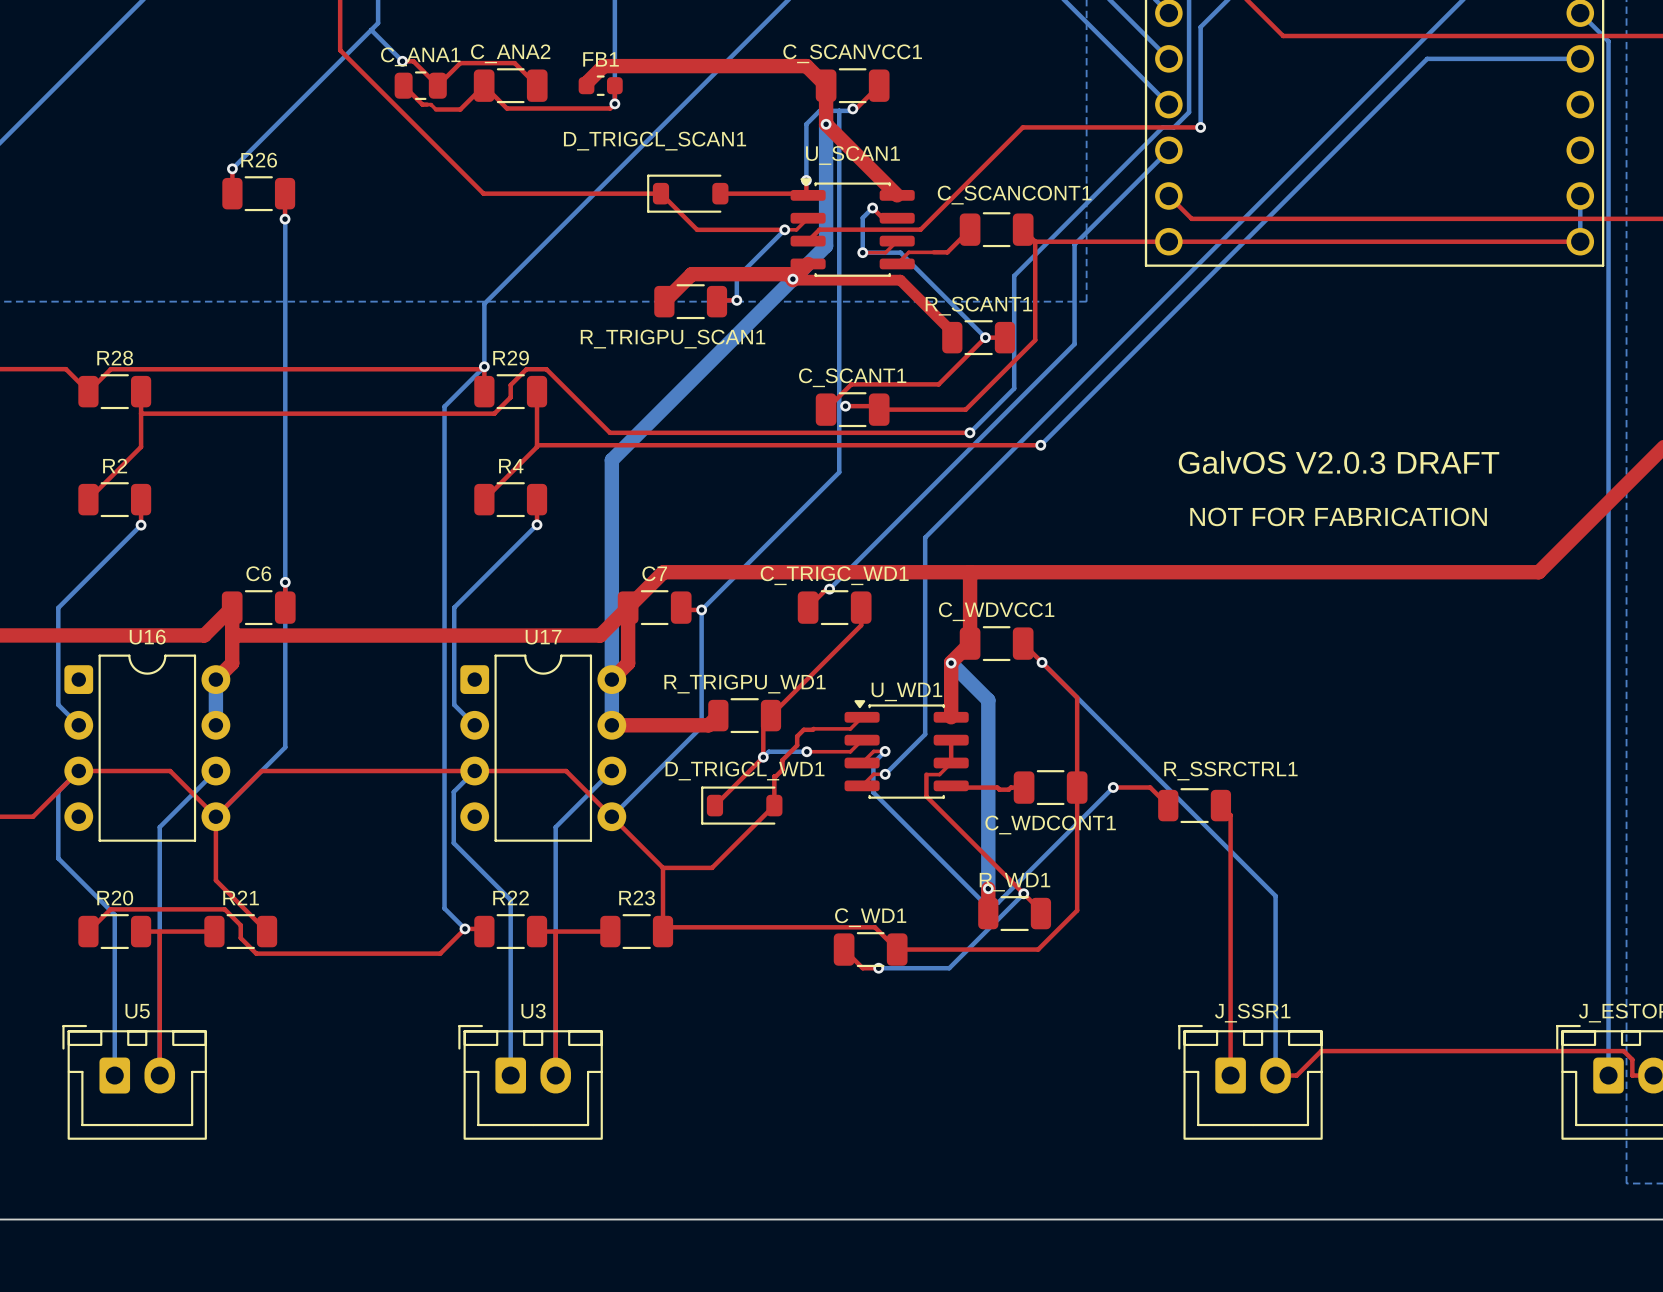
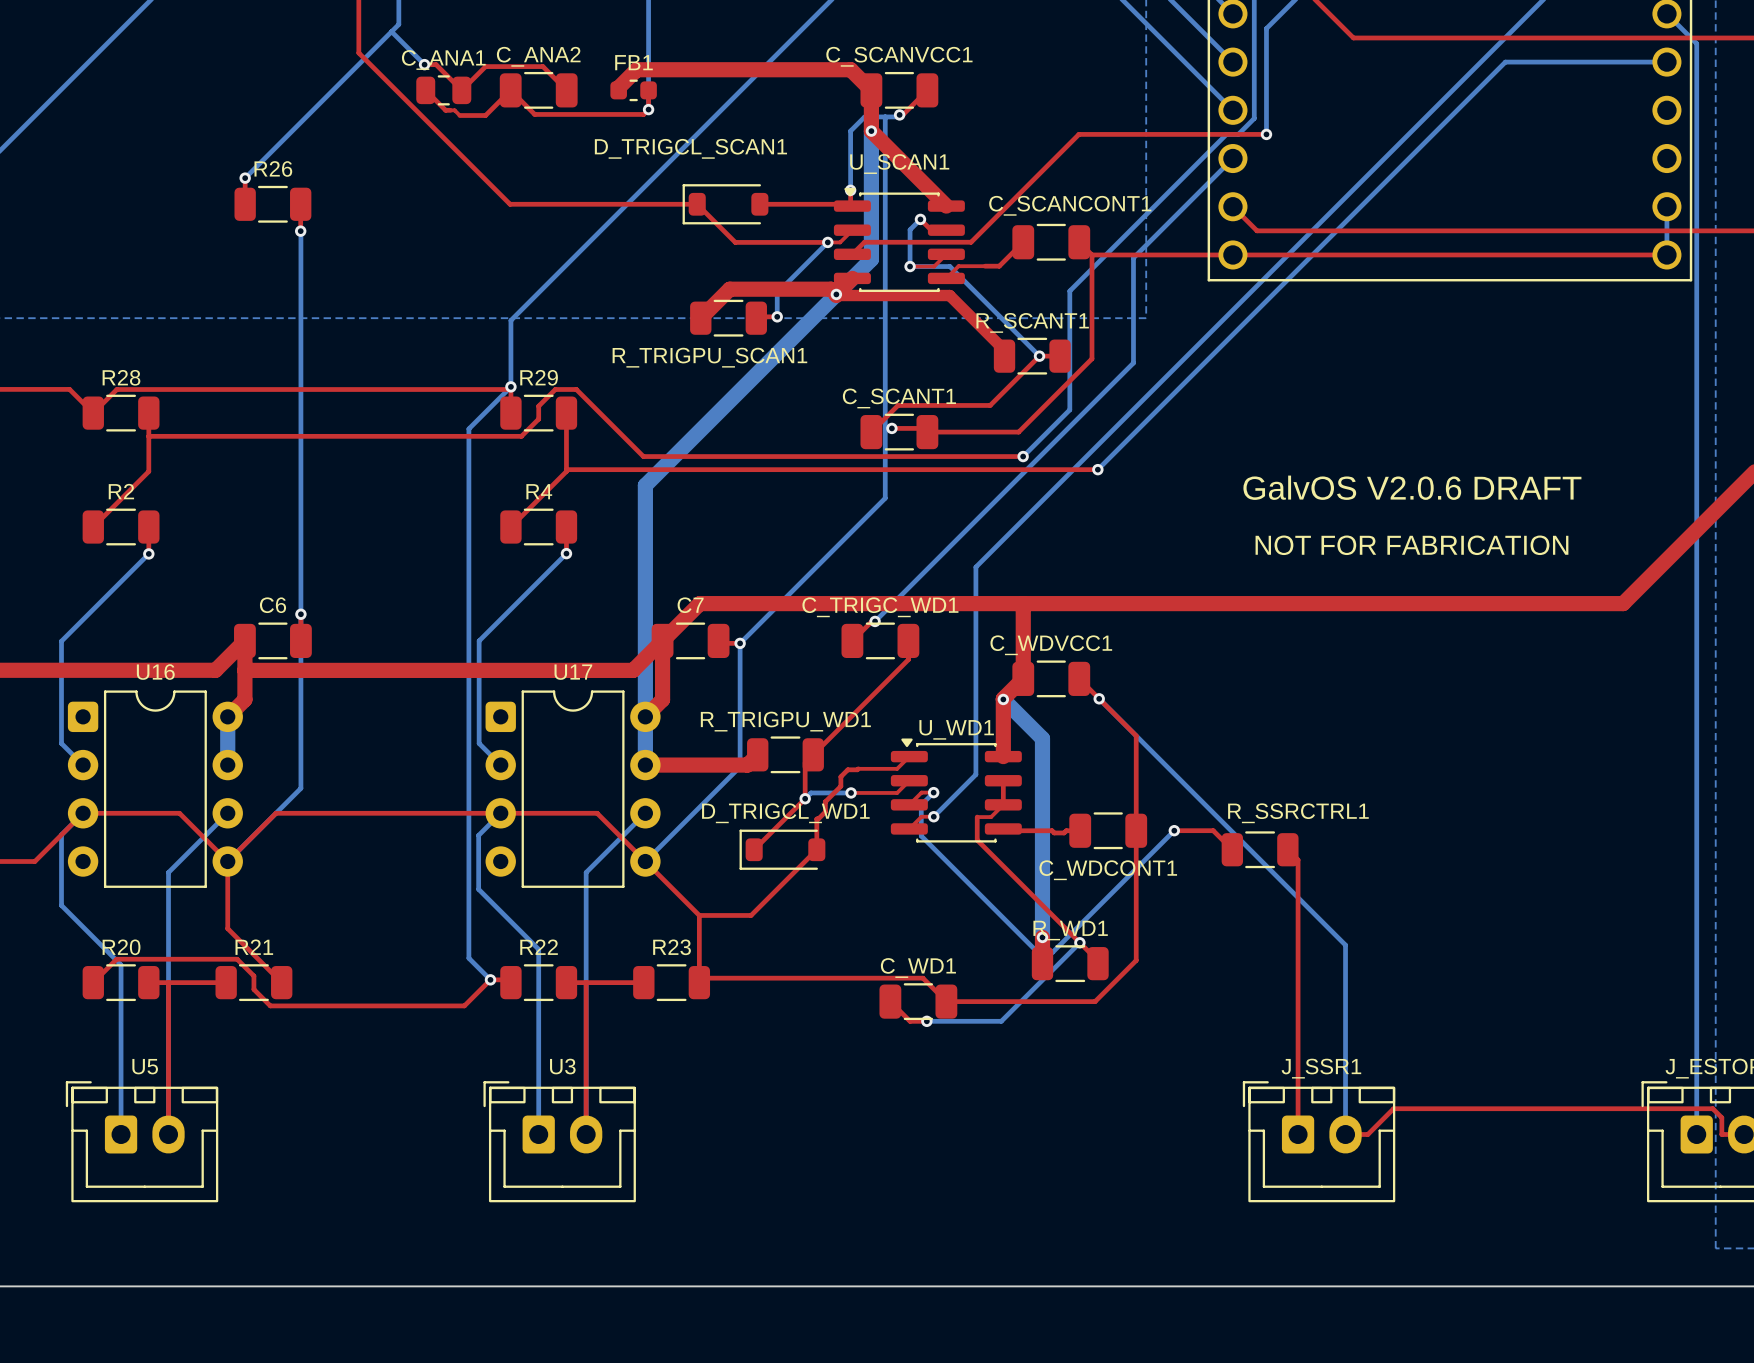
text: GalvOS V2.0.3 DRAFT (1339, 462) -> GalvOS V2.0.6 DRAFT (1412, 487)

